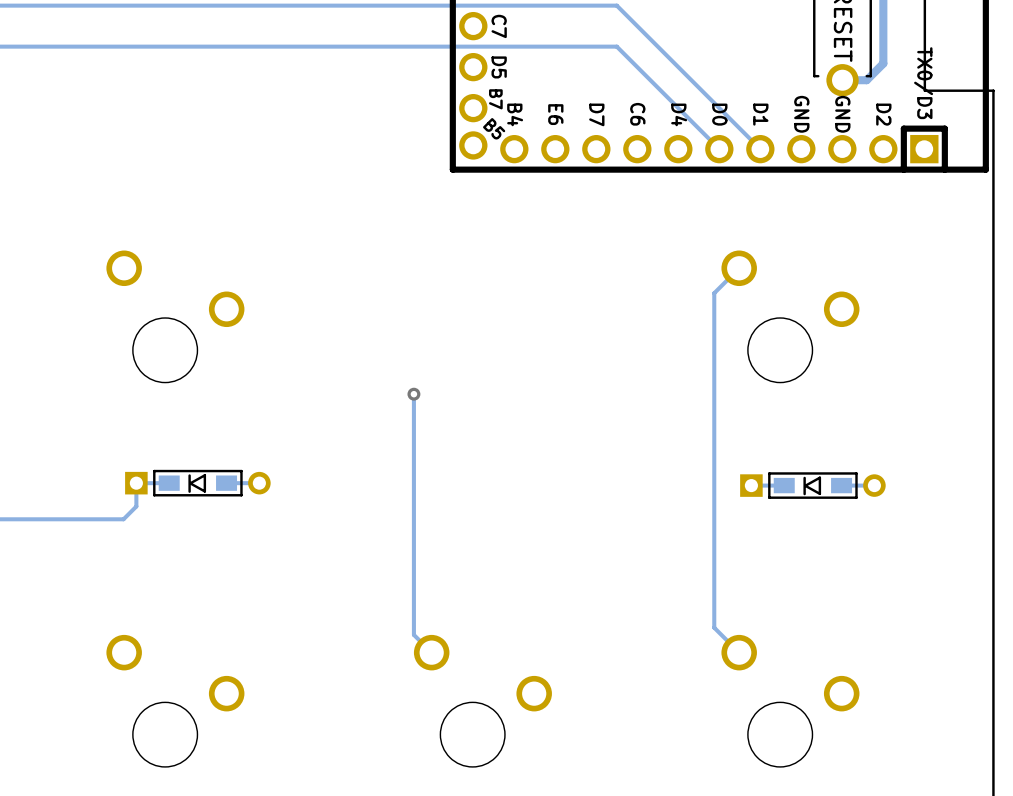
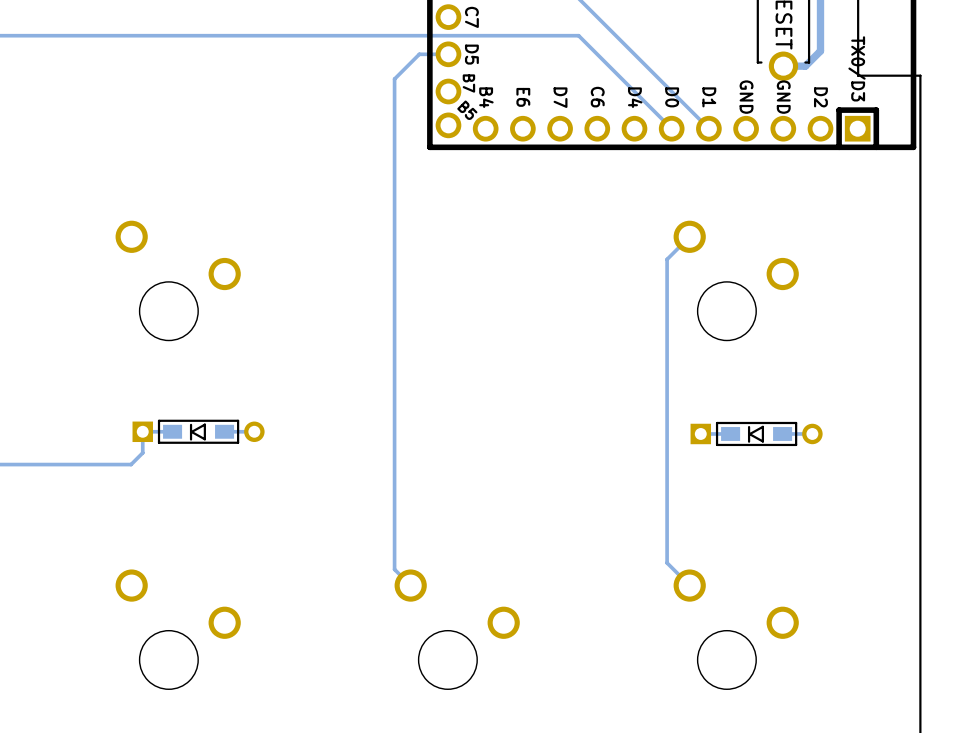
track: none -> (448, 54) (419, 54) (394, 79) (394, 351)
via: (413, 394) -> none

